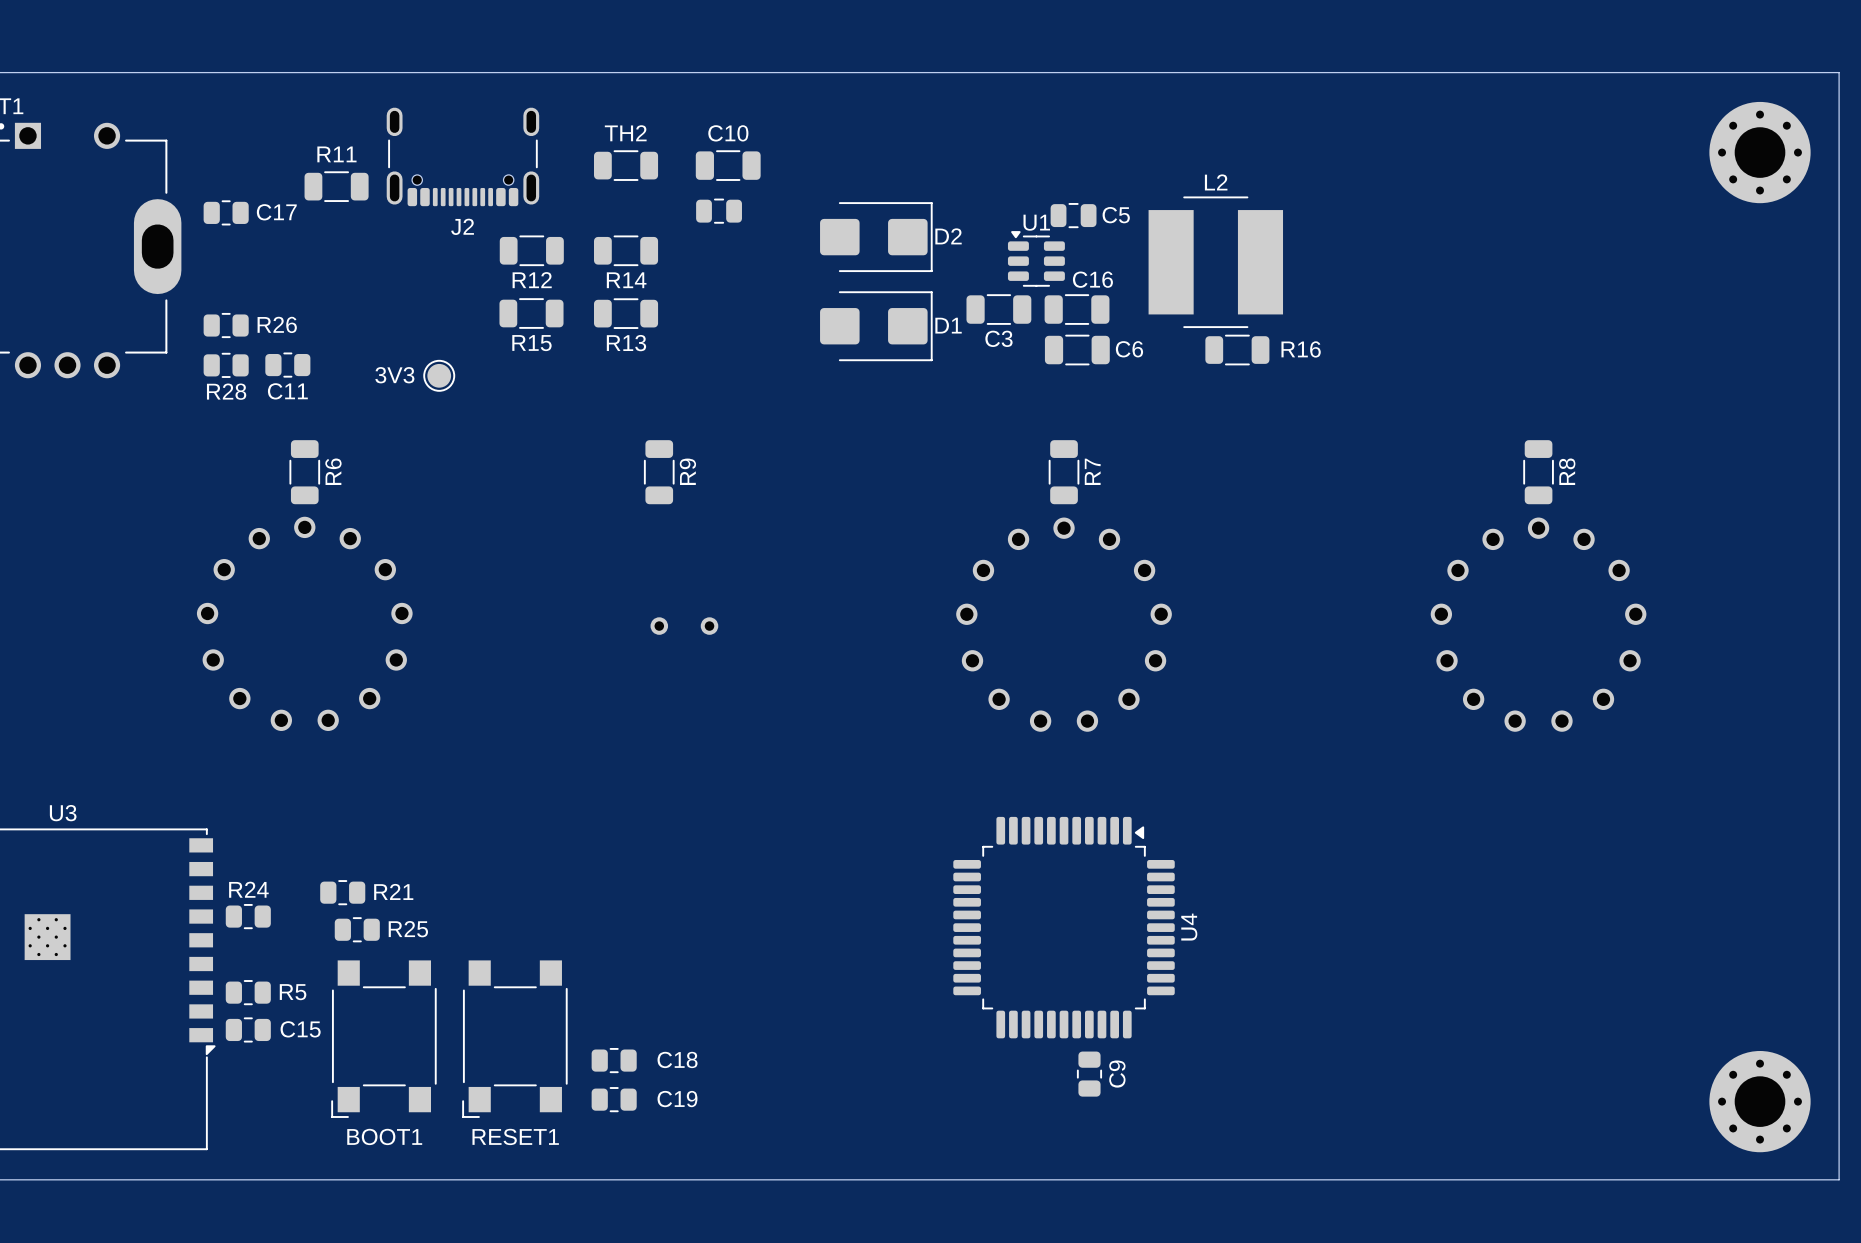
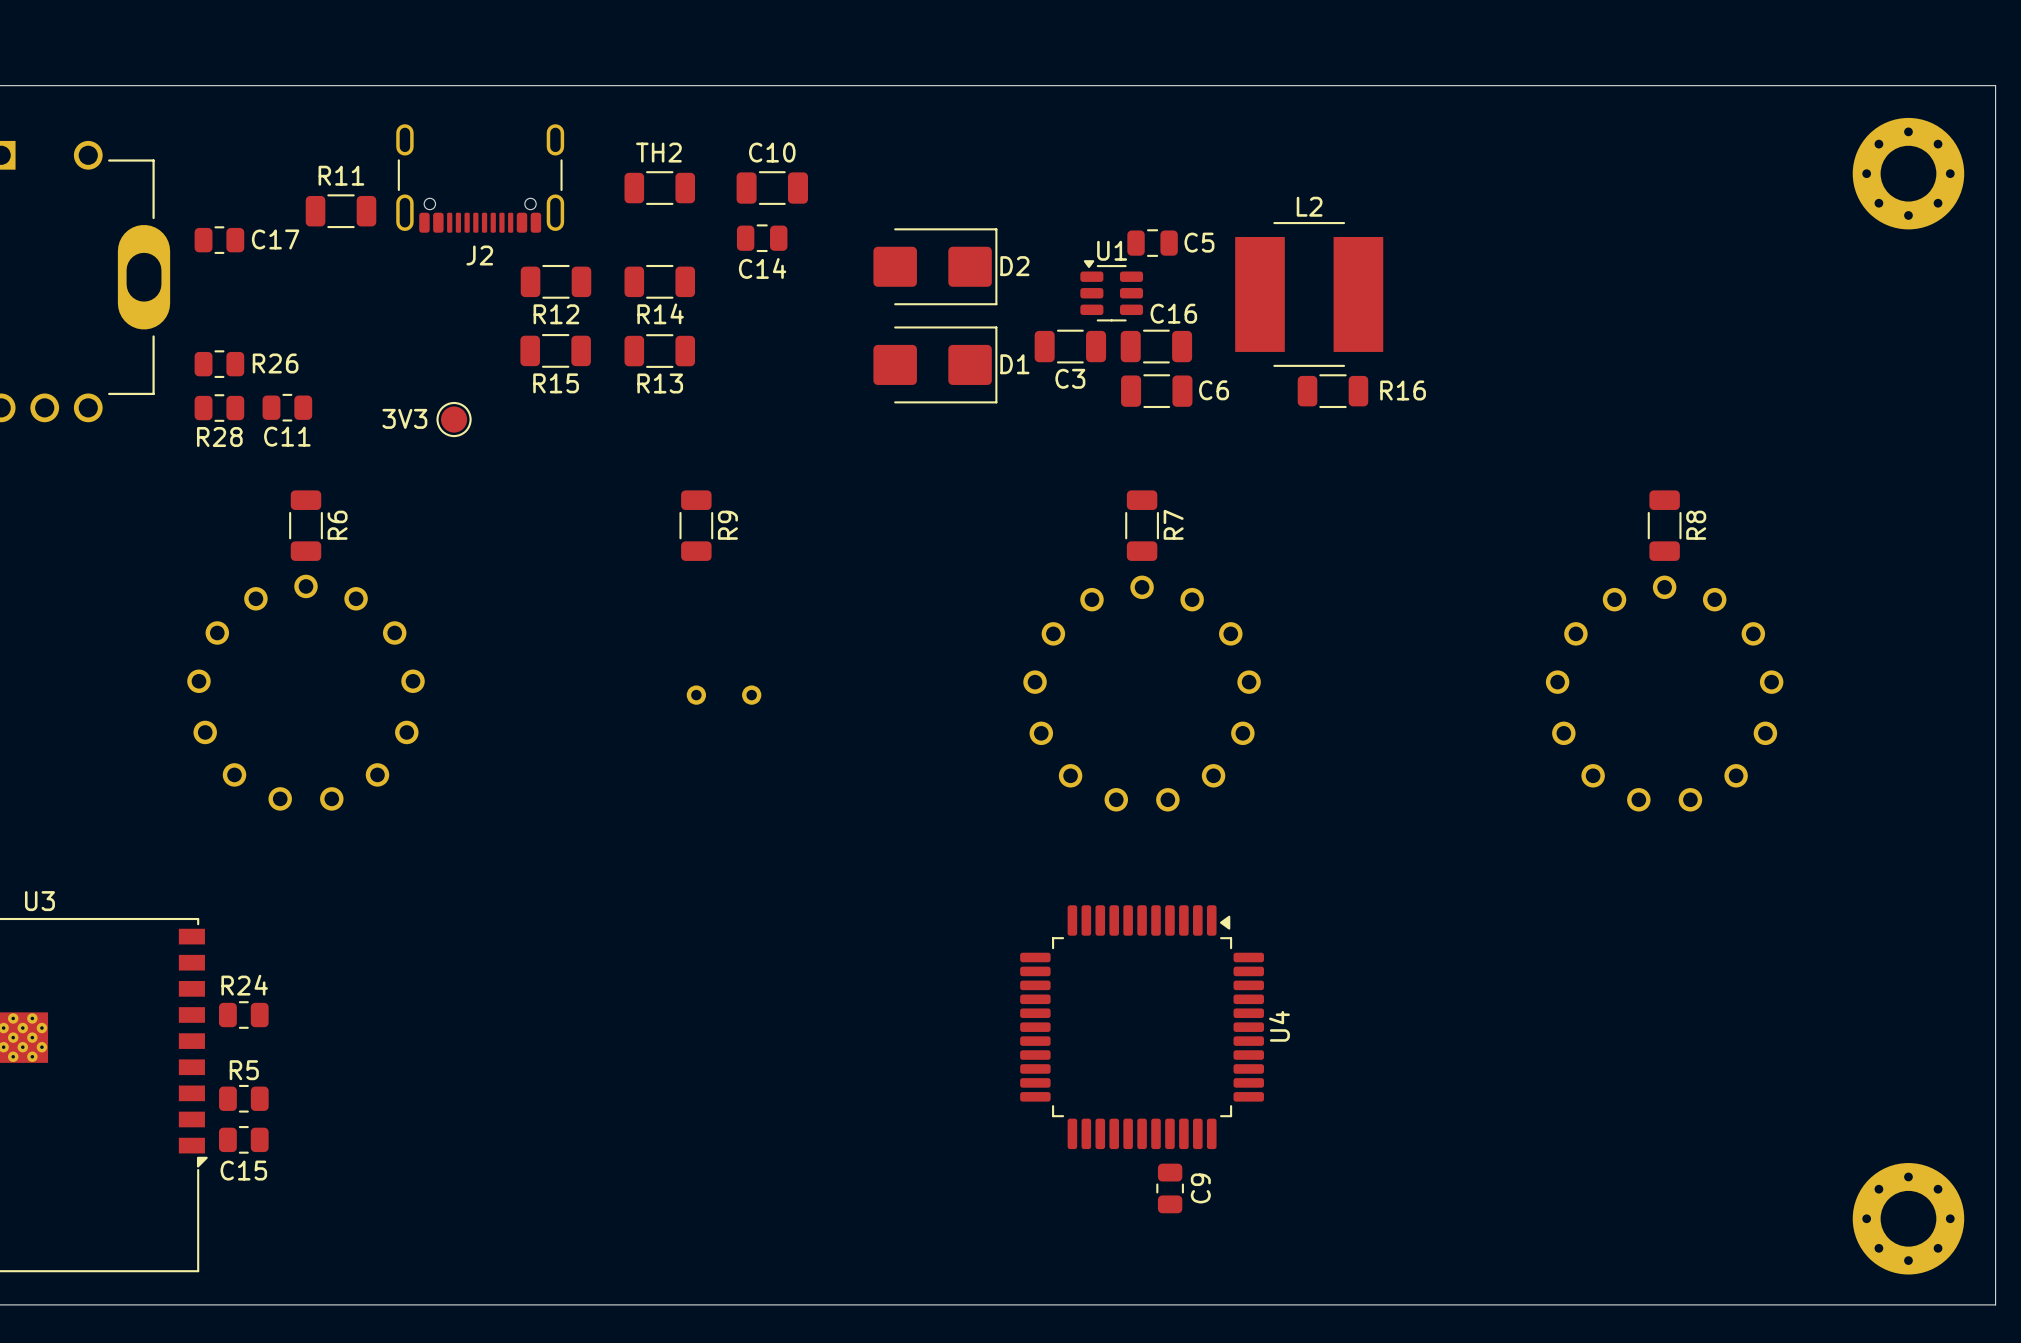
C14 name: none -> C14 (762, 268)
R21: (342, 892) -> none
R25: (357, 929) -> none
R5 name position: R5 (293, 992) -> R5 (244, 1070)
C15 name position: C15 (300, 1029) -> C15 (243, 1170)
BOOT1: (383, 1039) -> none
RESET1: (514, 1039) -> none
C18: (614, 1060) -> none
C19: (614, 1099) -> none

